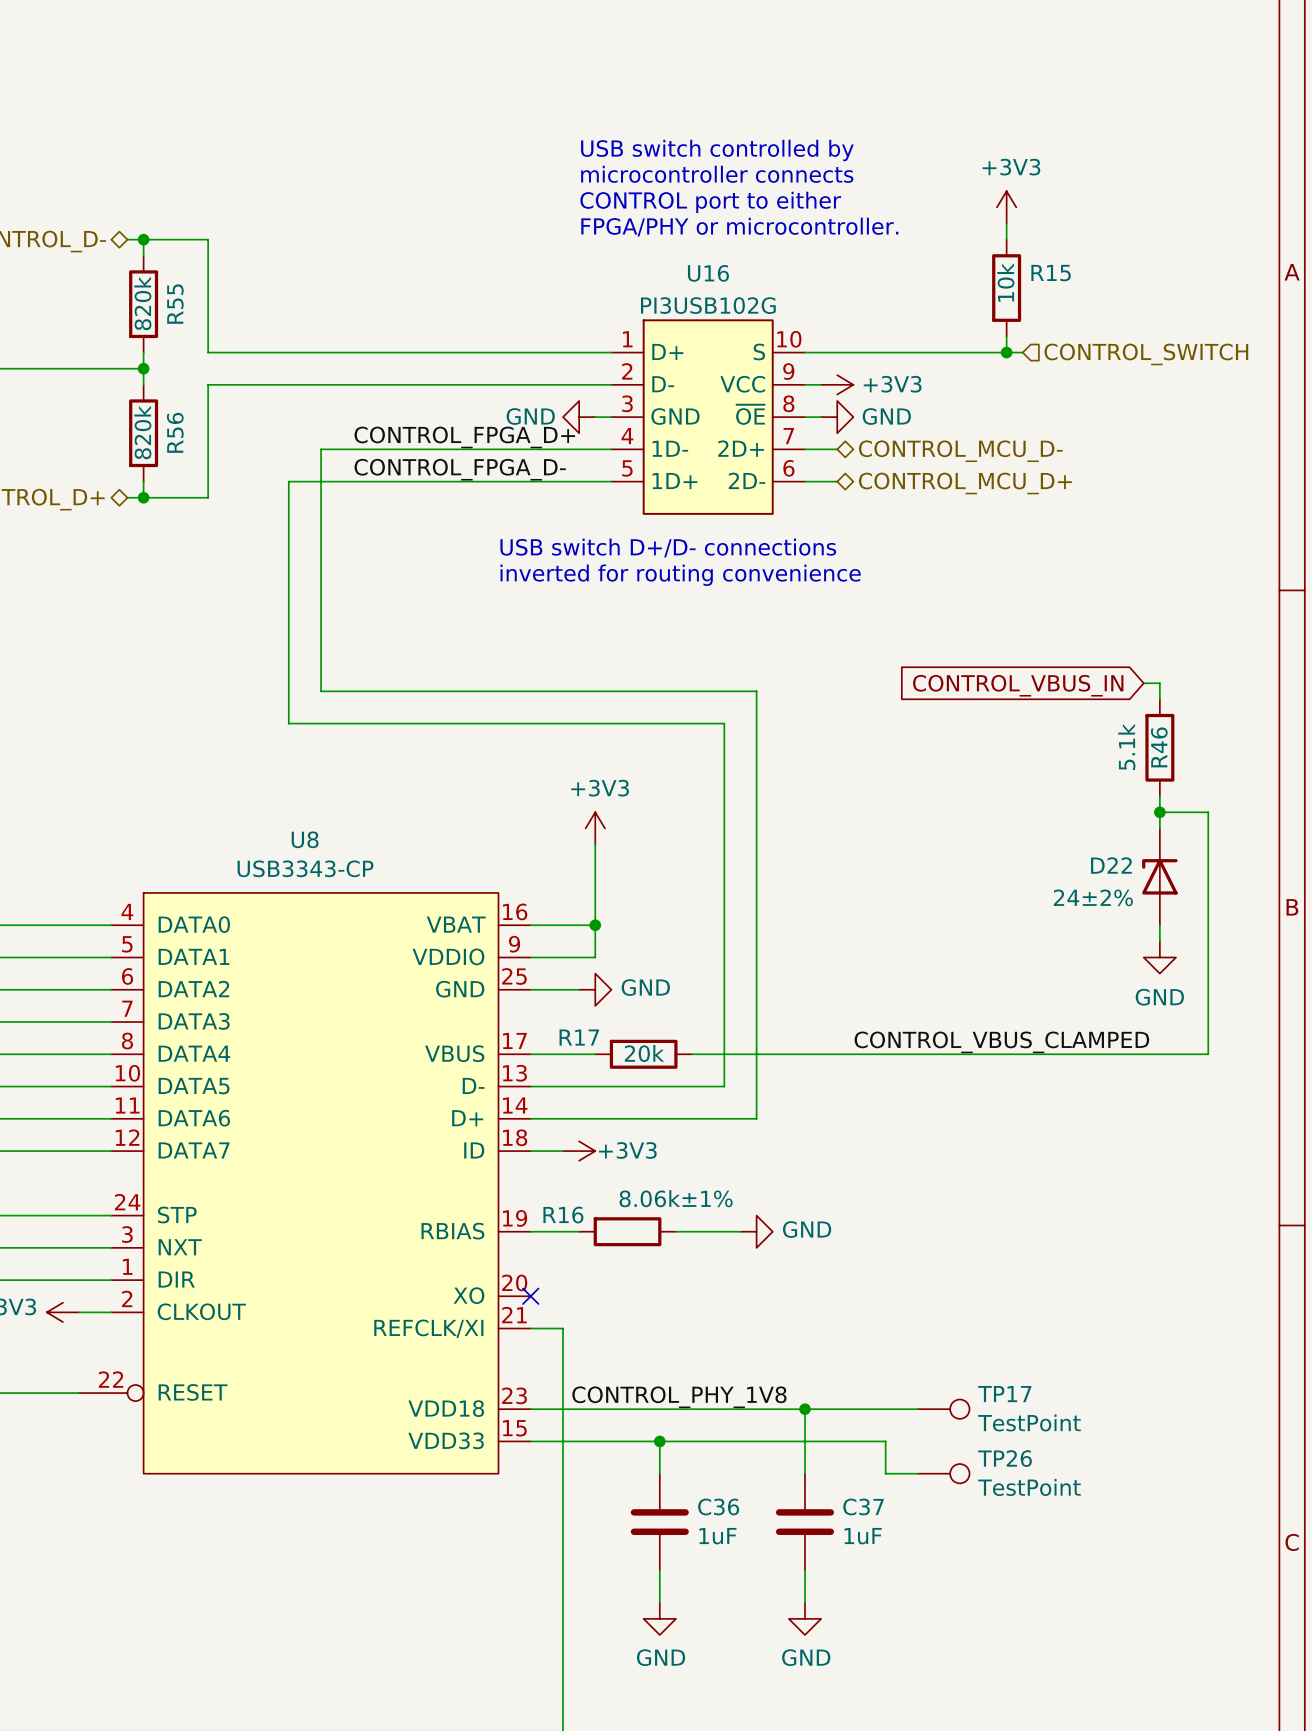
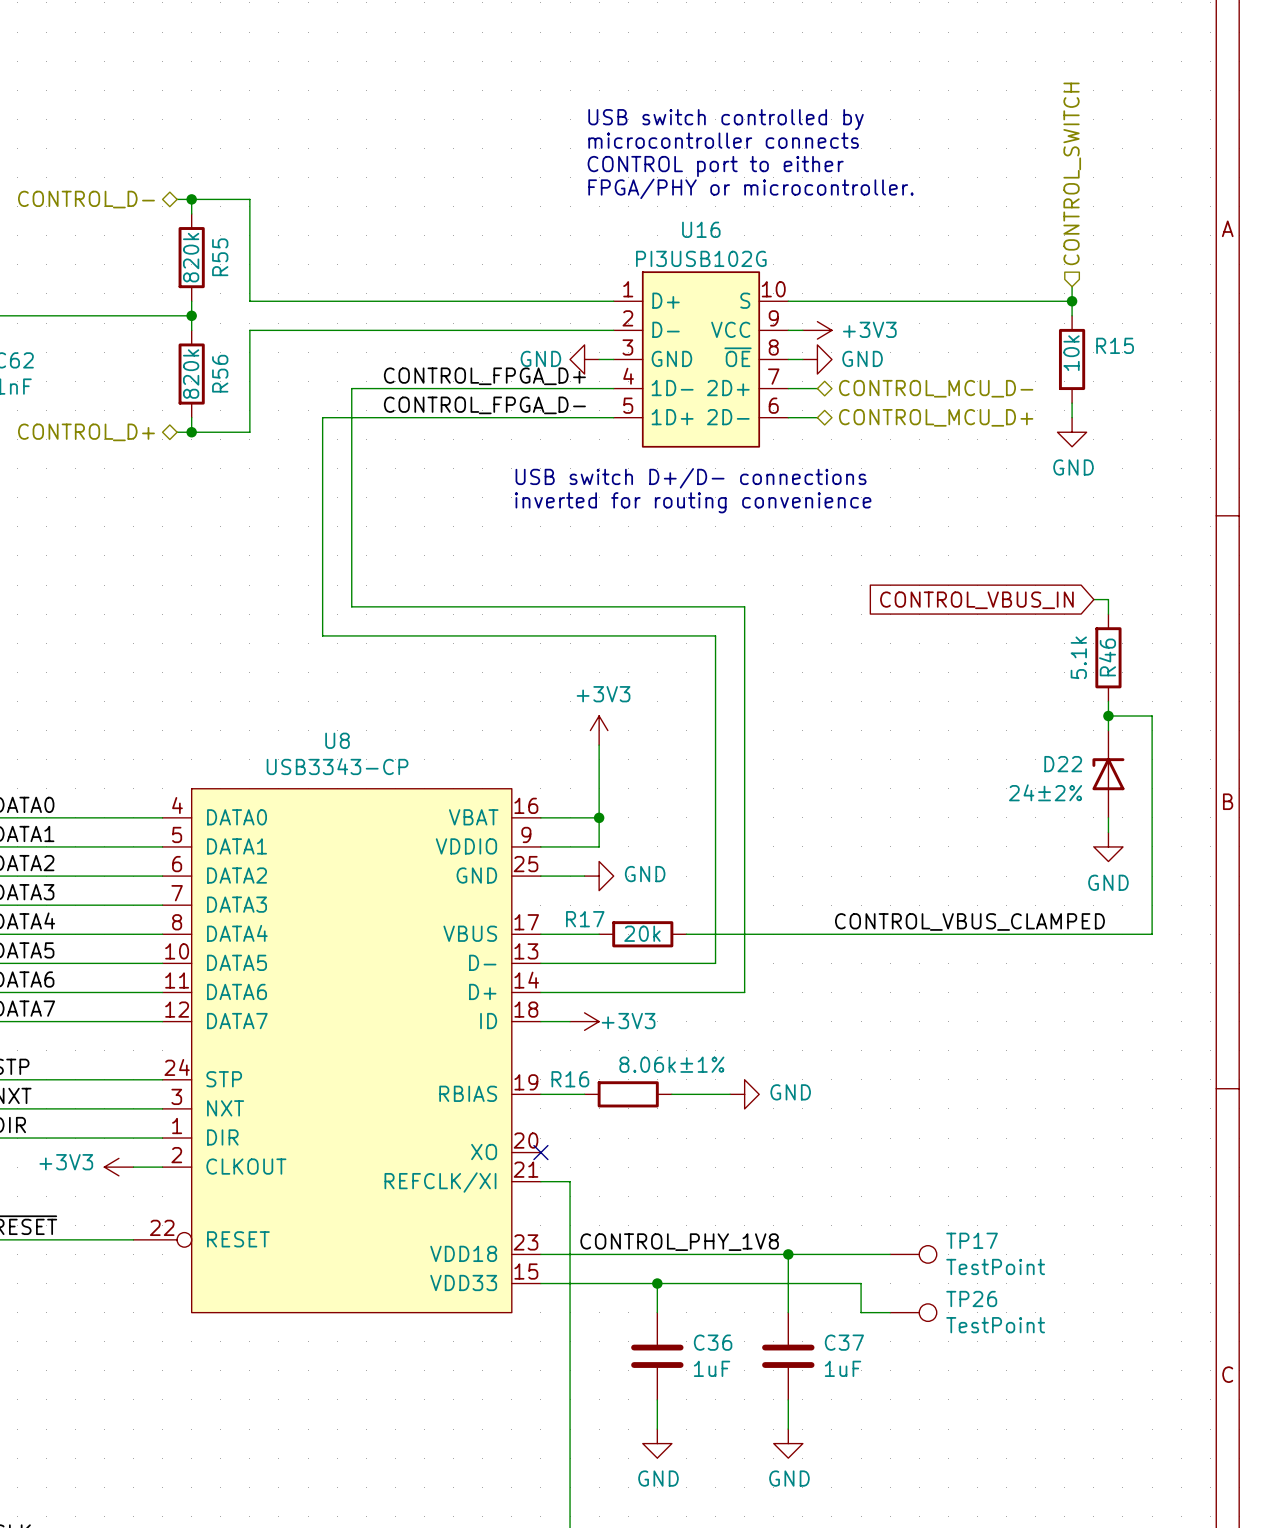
power symbol: +3V3 (1006, 207) -> none
wire: (1006, 223) (1006, 239) -> none
R15 position: (1006, 288) -> (1072, 359)
wire: (1006, 336) (1006, 352) -> (1072, 403) (1072, 417)
wire: none -> (1072, 286) (1072, 315)
junction: (1006, 352) -> none
wire: none -> (984, 301) (1072, 301)
junction: none -> (1072, 301)
hierarchical label rotation: 0° (1146, 354) -> 90° counterclockwise (1072, 173)
power symbol: none -> GND (1072, 432)

